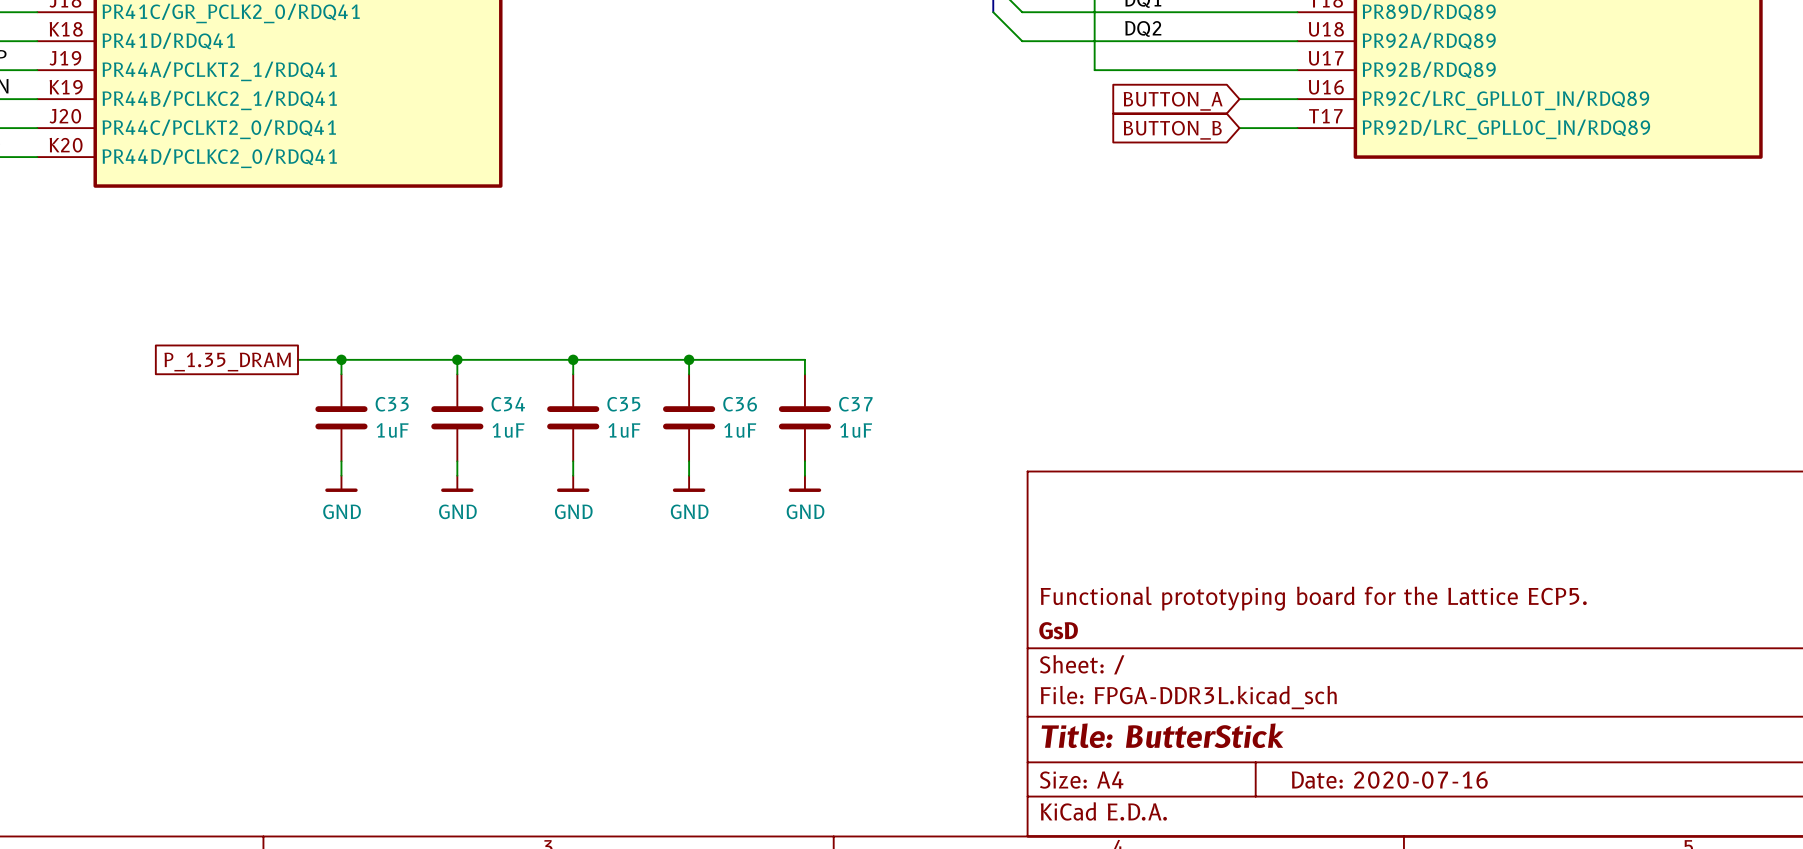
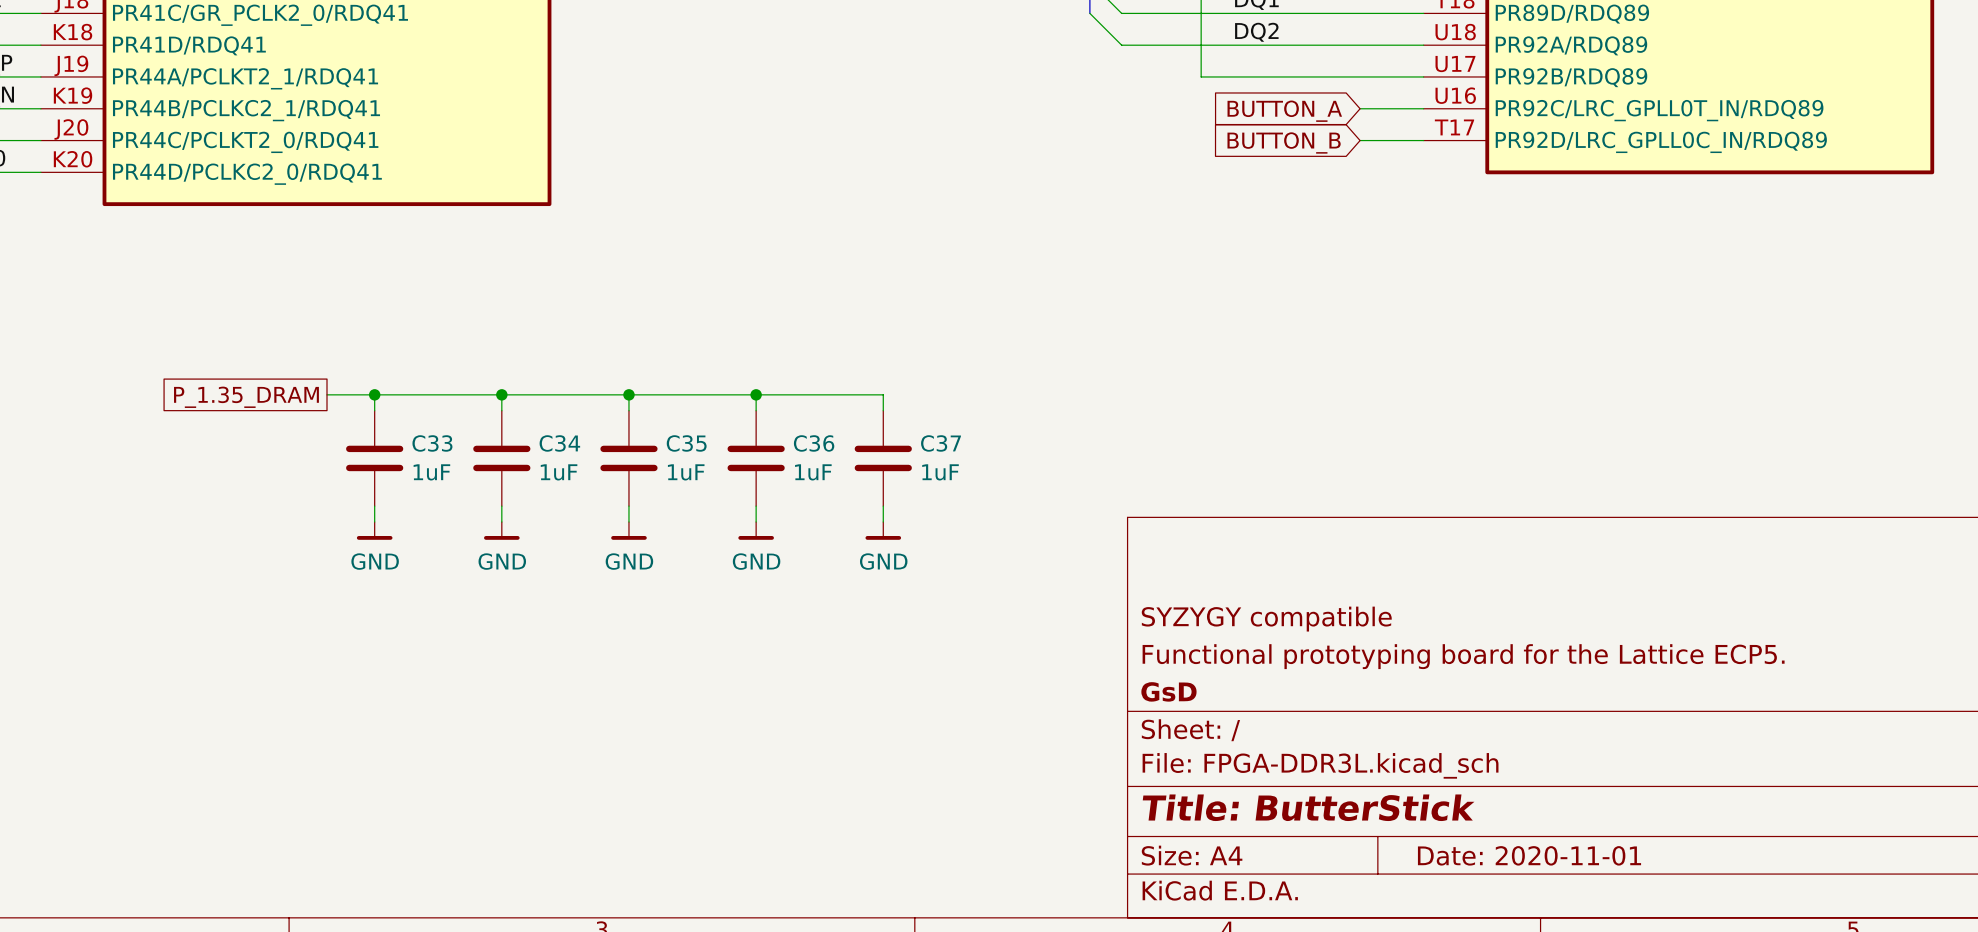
title block: none -> SYZYGY compatible (1266, 619)
title block: Date: 2020-07-16 (1389, 780) -> Date: 2020-11-01 (1529, 855)

